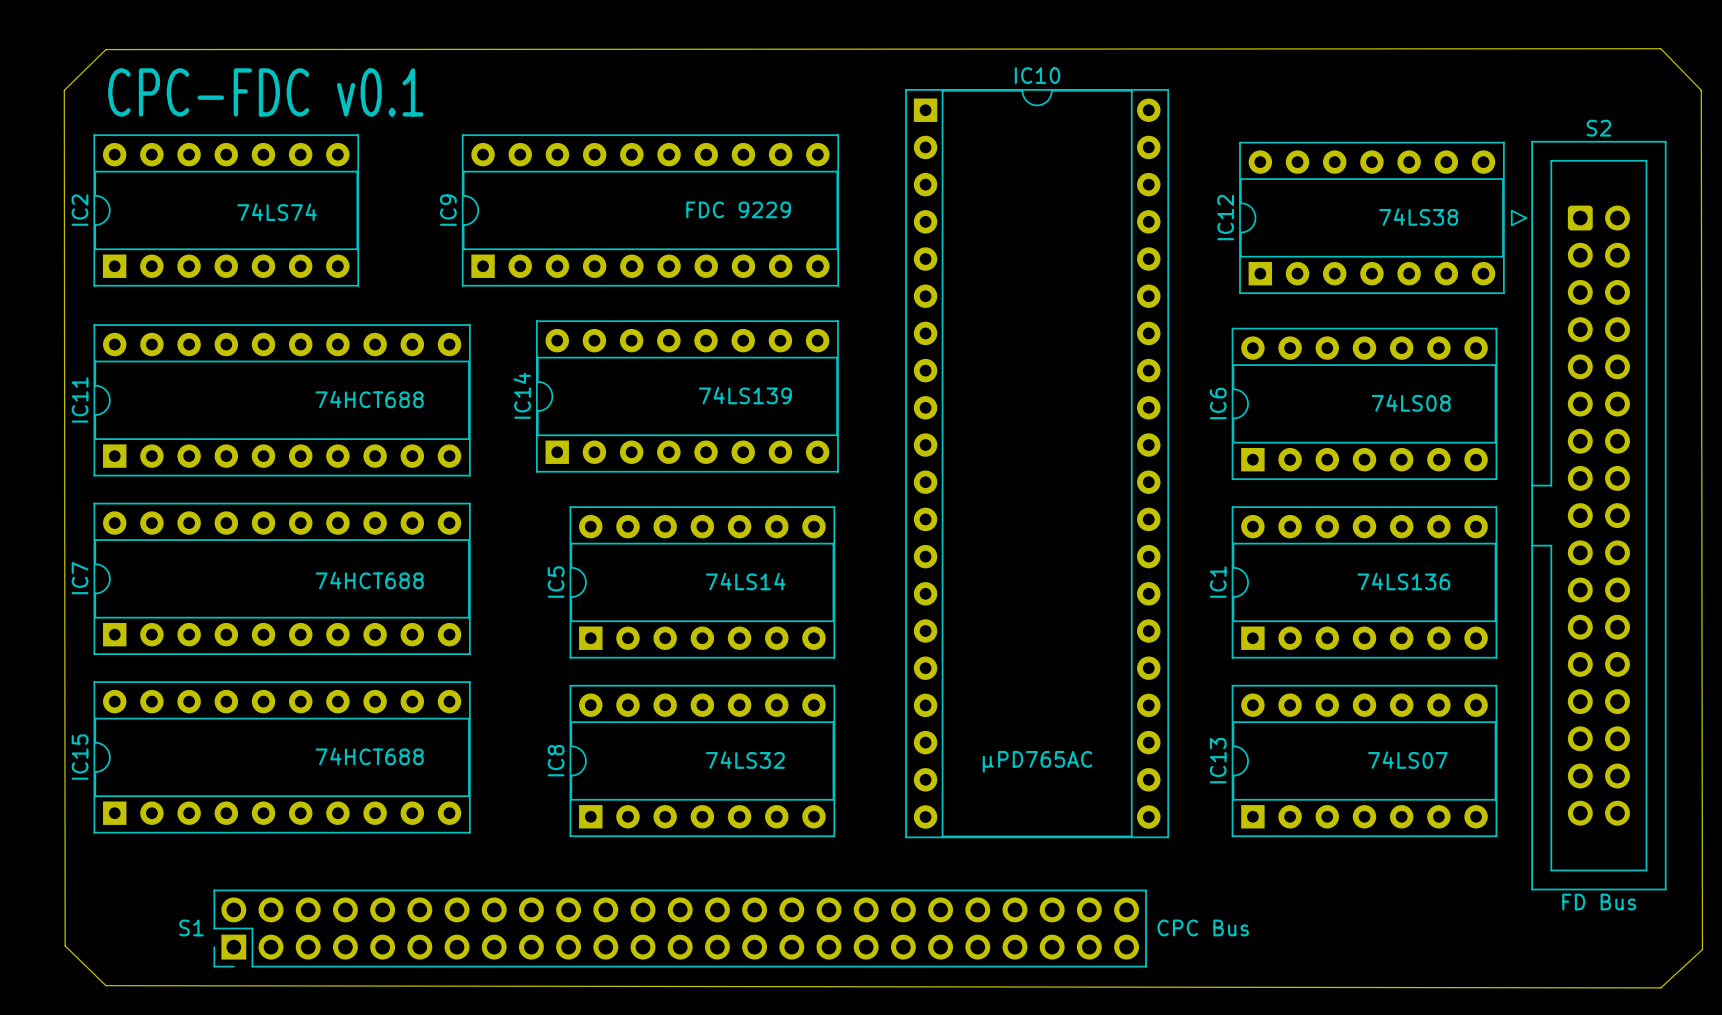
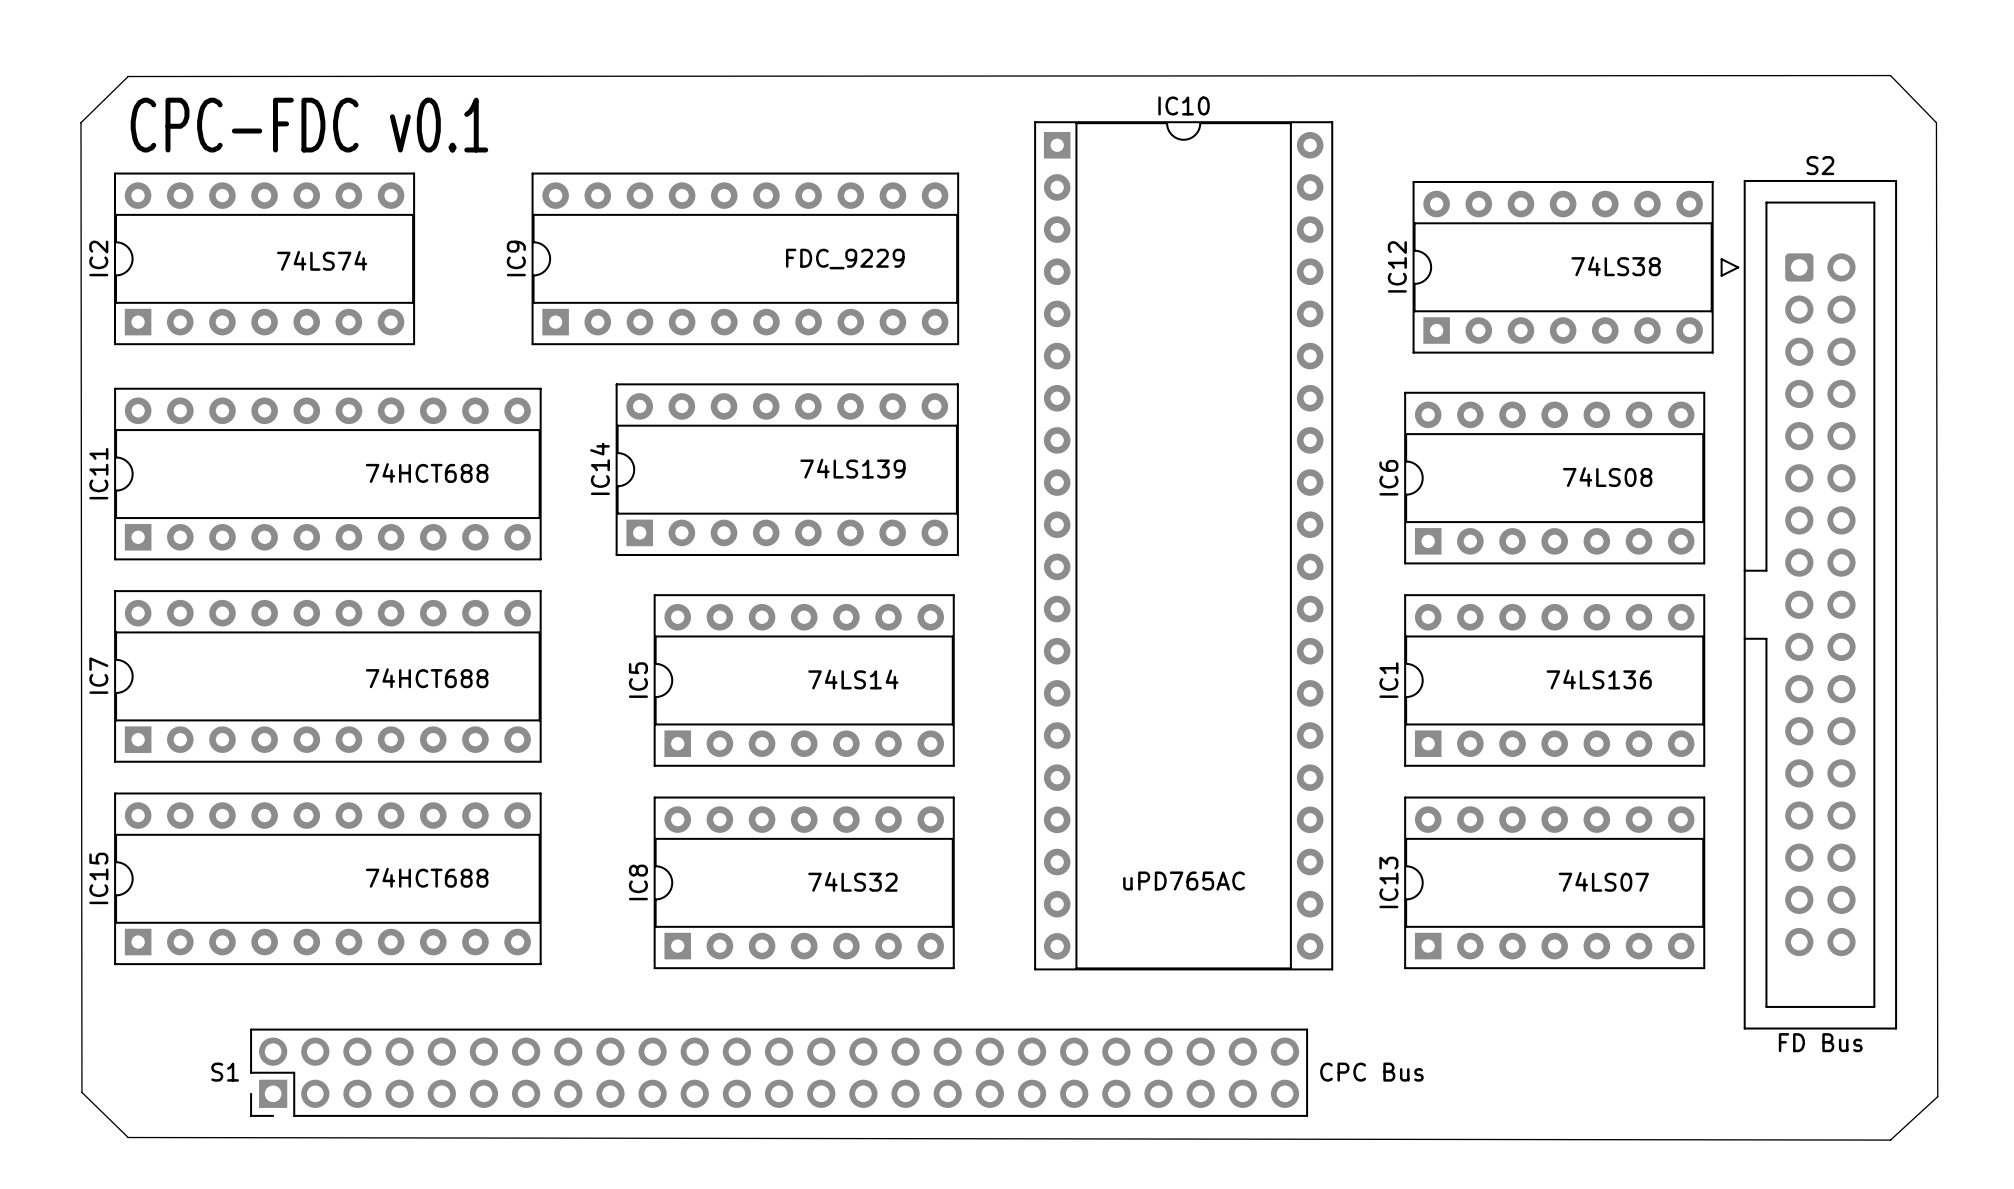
IC9 value: FDC 9229 (738, 209) -> FDC_9229 (845, 259)
IC10 value: μPD765AC (1037, 761) -> uPD765AC (1184, 881)

